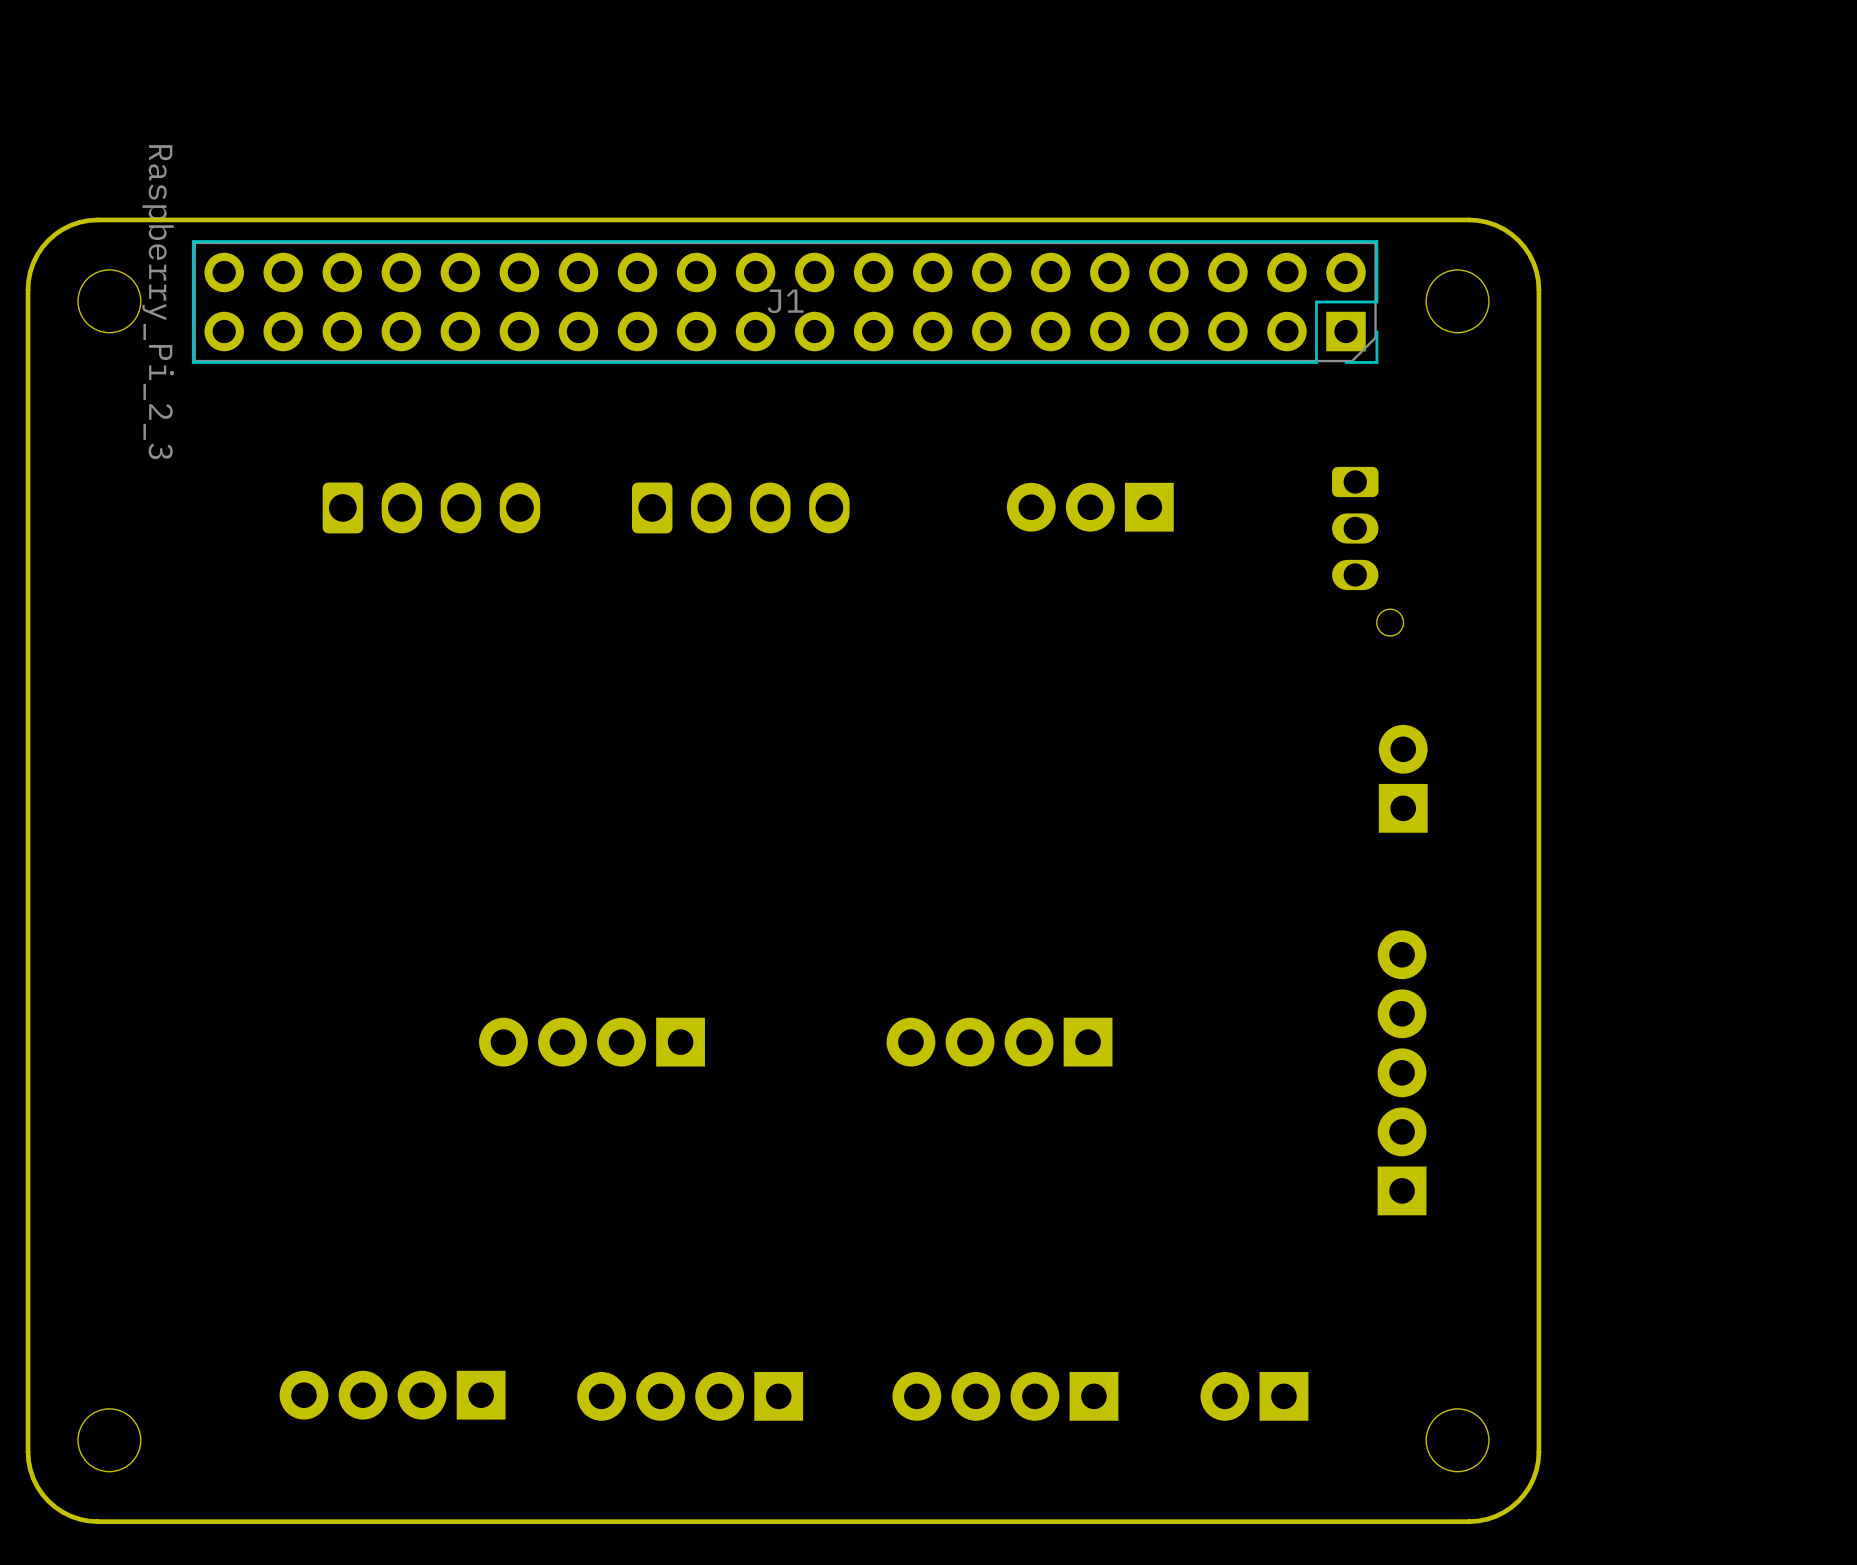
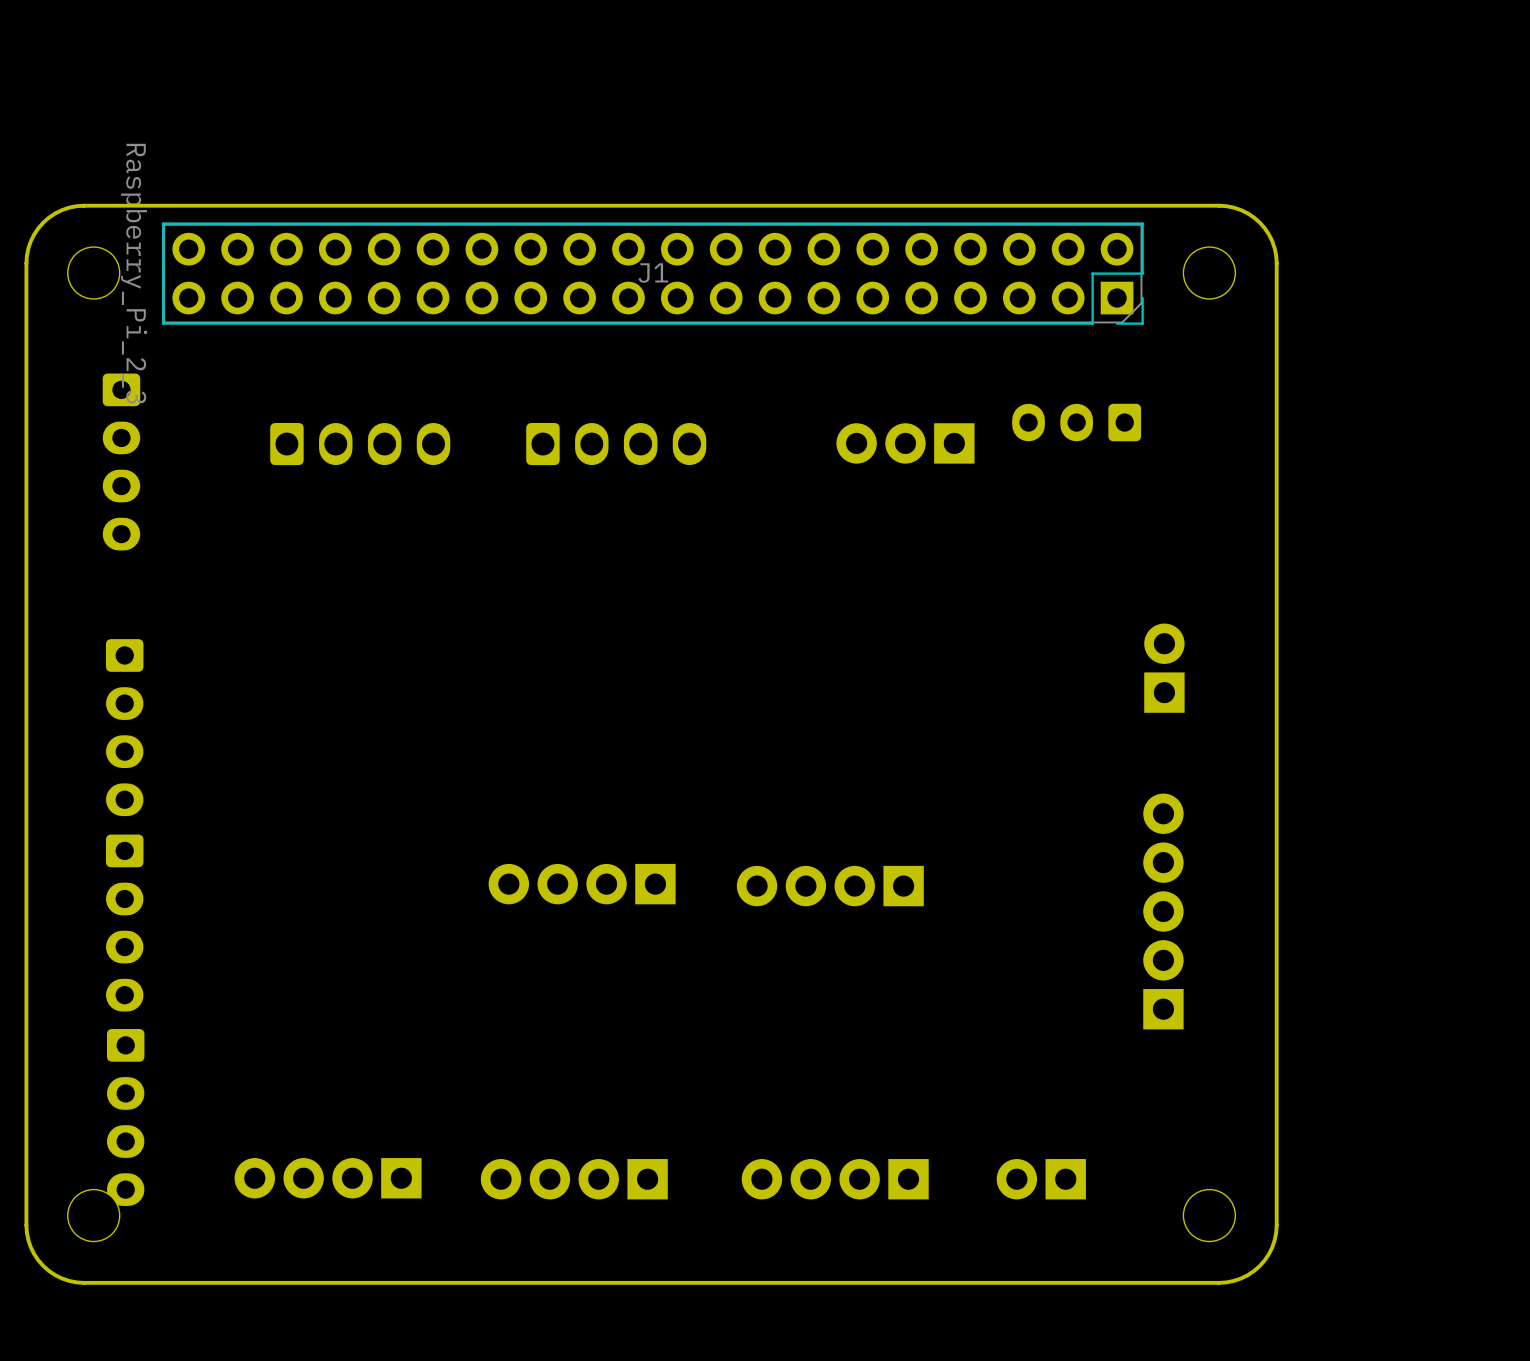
part: none -> (1076, 422)
part: none -> (121, 461)
part: (1367, 551) -> none
part: none -> (124, 727)
part position: (592, 1042) -> (582, 884)
part: none -> (124, 923)
part: none -> (125, 1117)

